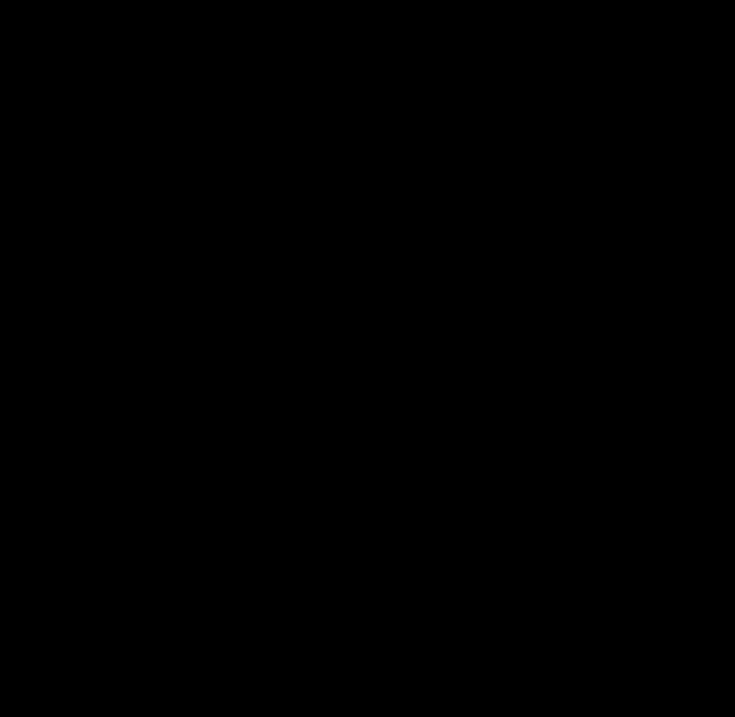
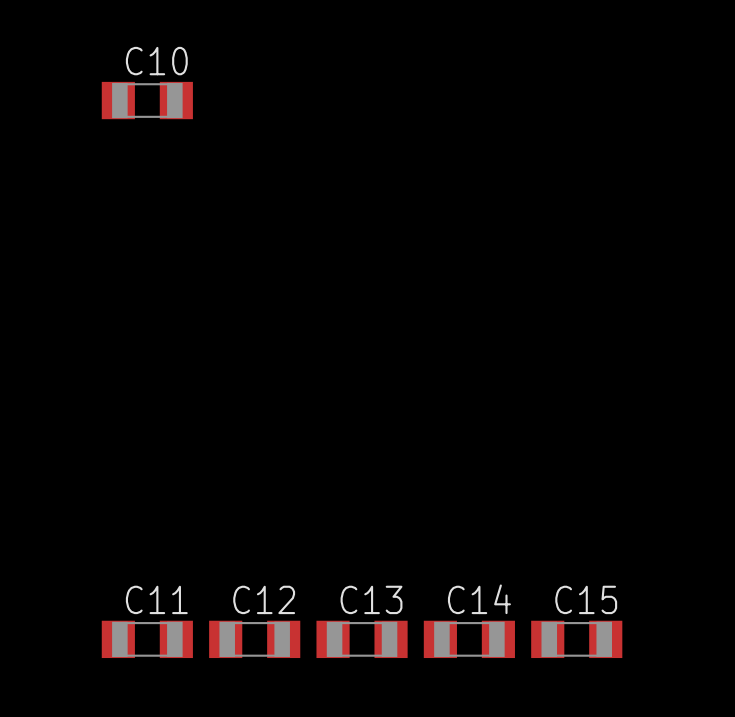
C10: none -> (147, 100)
C11: none -> (147, 639)
C12: none -> (254, 639)
C13: none -> (362, 639)
C14: none -> (469, 639)
C15: none -> (576, 639)

